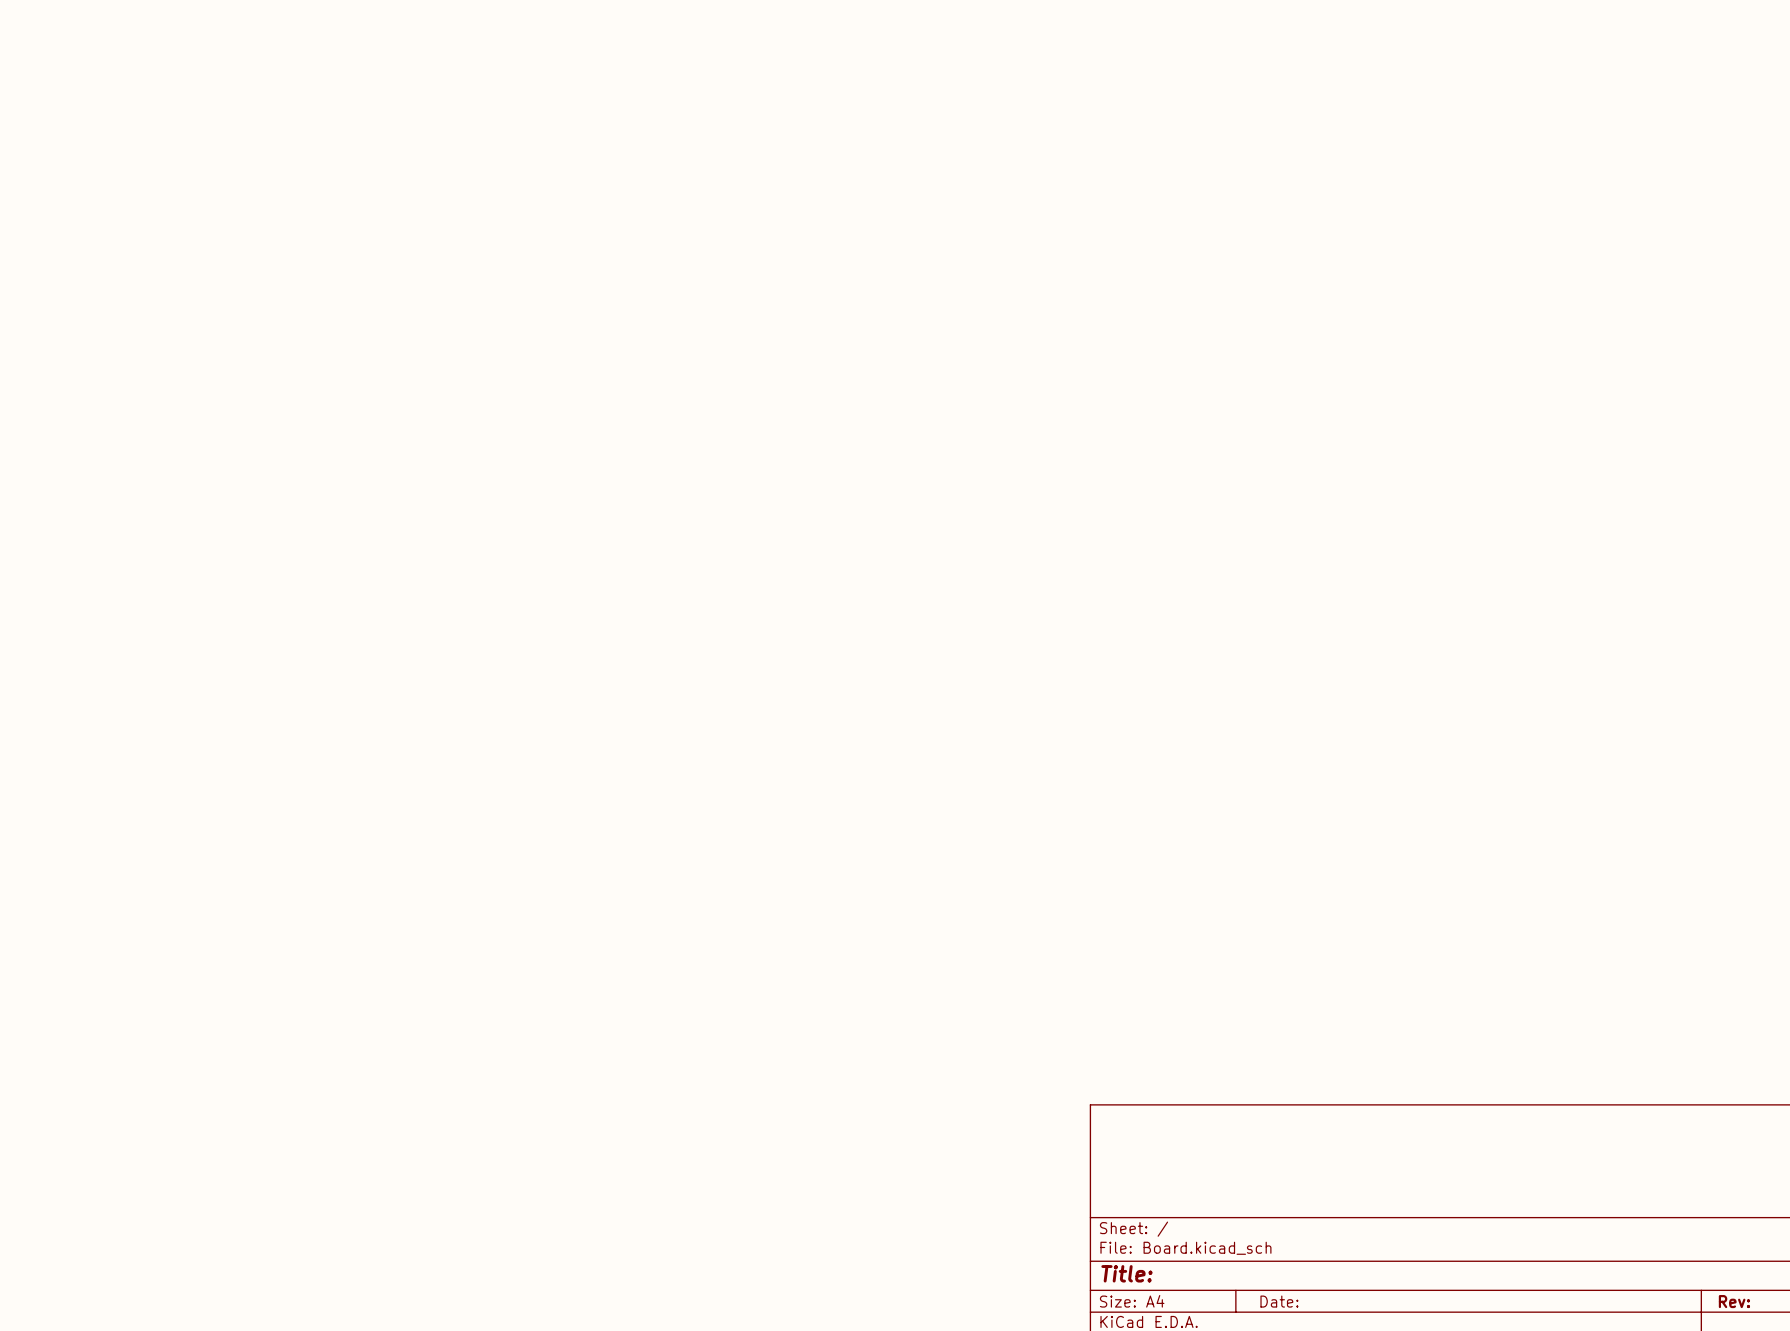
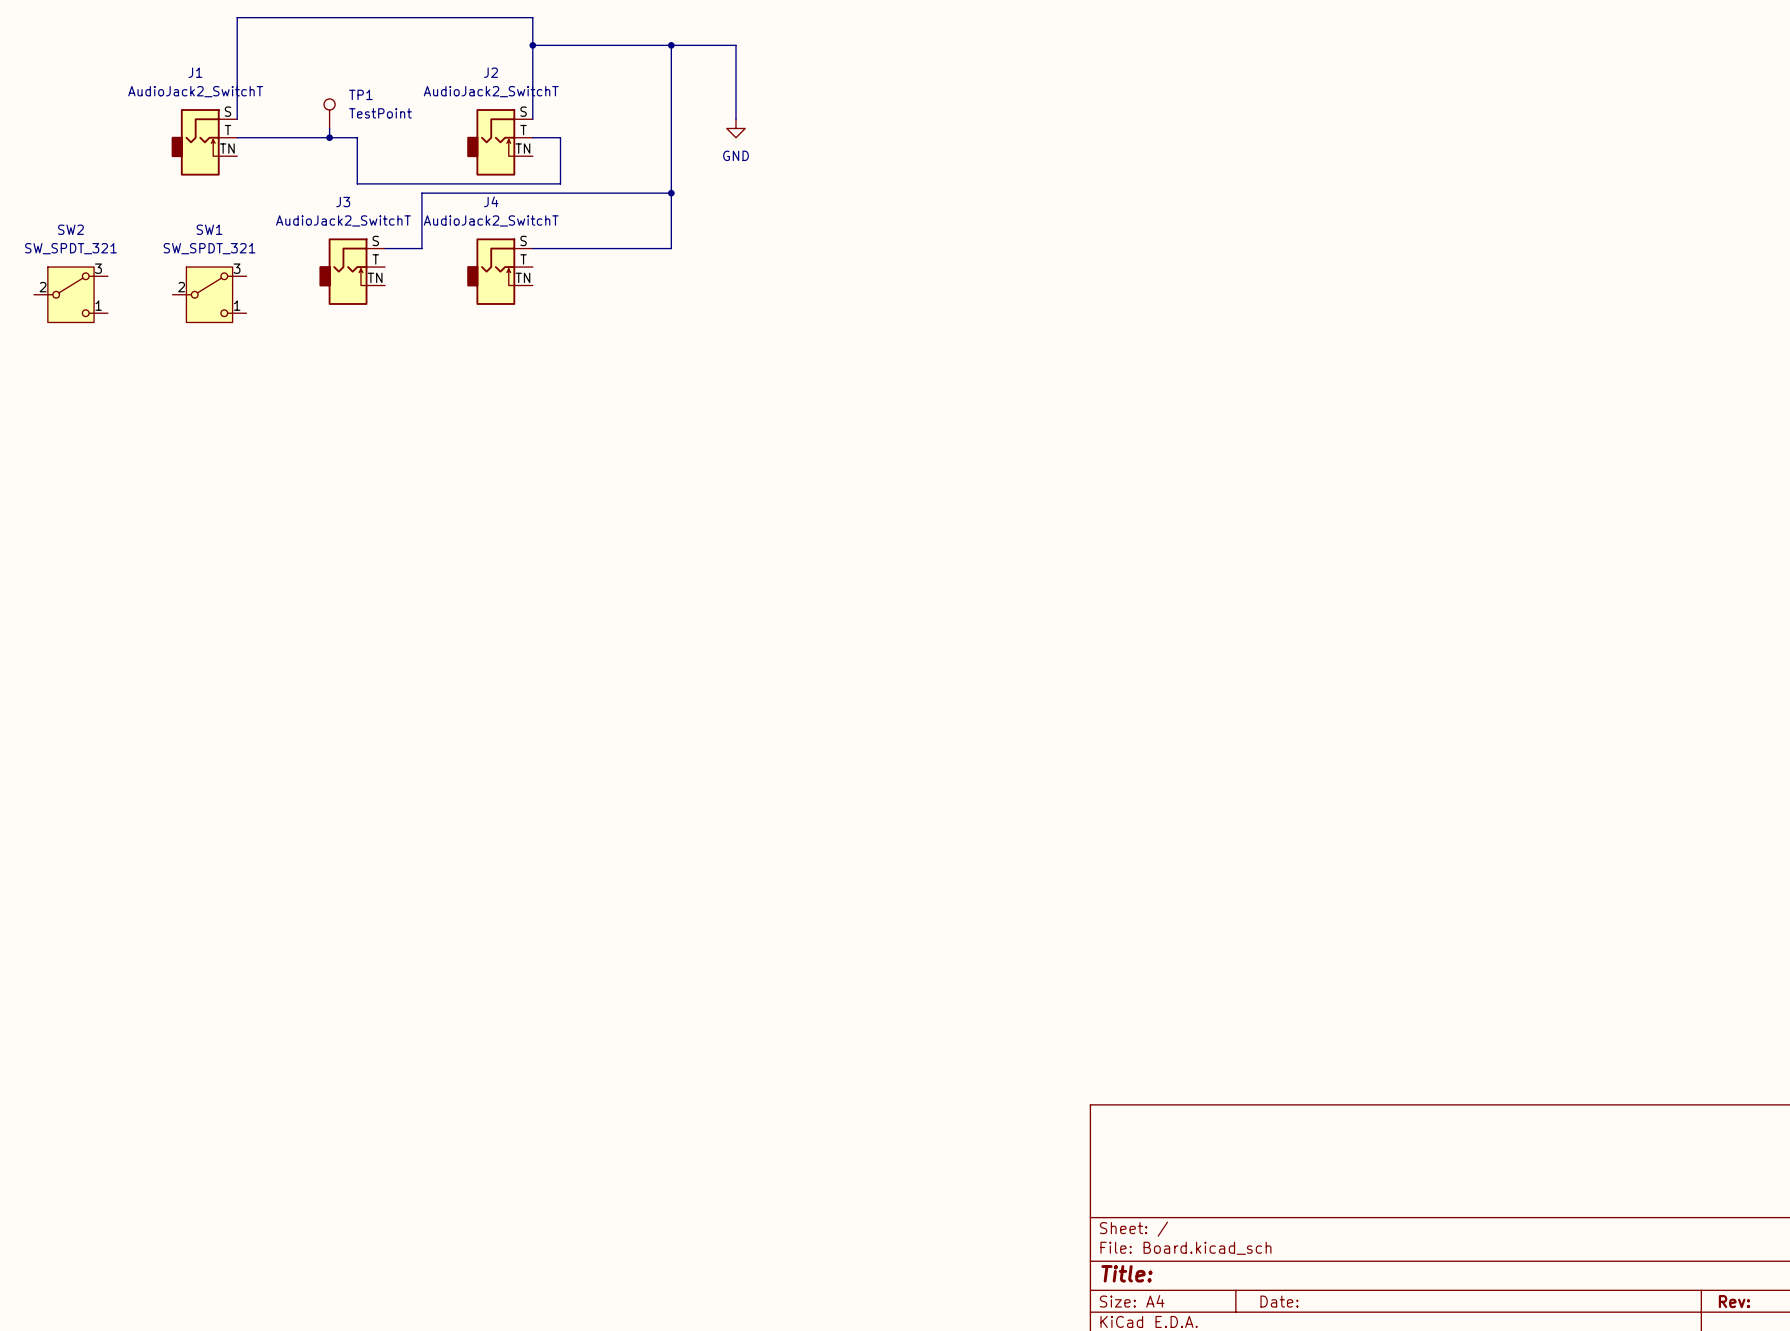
wire: none -> (532, 45) (736, 45) (736, 119)
junction: none -> (532, 45)
wire: none -> (671, 45) (671, 248) (532, 248)
junction: none -> (671, 45)
TP1: none -> TestPoint (329, 113)
wire: none -> (237, 119) (237, 17) (532, 17) (532, 119)
wire: none -> (329, 128) (329, 137)
power symbol: none -> GND (736, 128)
wire: none -> (237, 137) (357, 137) (357, 183) (560, 183) (560, 137) (532, 137)
junction: none -> (329, 137)
J1: none -> AudioJack2_SwitchT (204, 142)
J2: none -> AudioJack2_SwitchT (500, 142)
wire: none -> (671, 193) (421, 193) (421, 248) (385, 248)
junction: none -> (671, 193)
J3: none -> AudioJack2_SwitchT (352, 271)
J4: none -> AudioJack2_SwitchT (500, 271)
SW2: none -> SW_SPDT_321 (70, 294)
SW1: none -> SW_SPDT_321 (209, 294)

